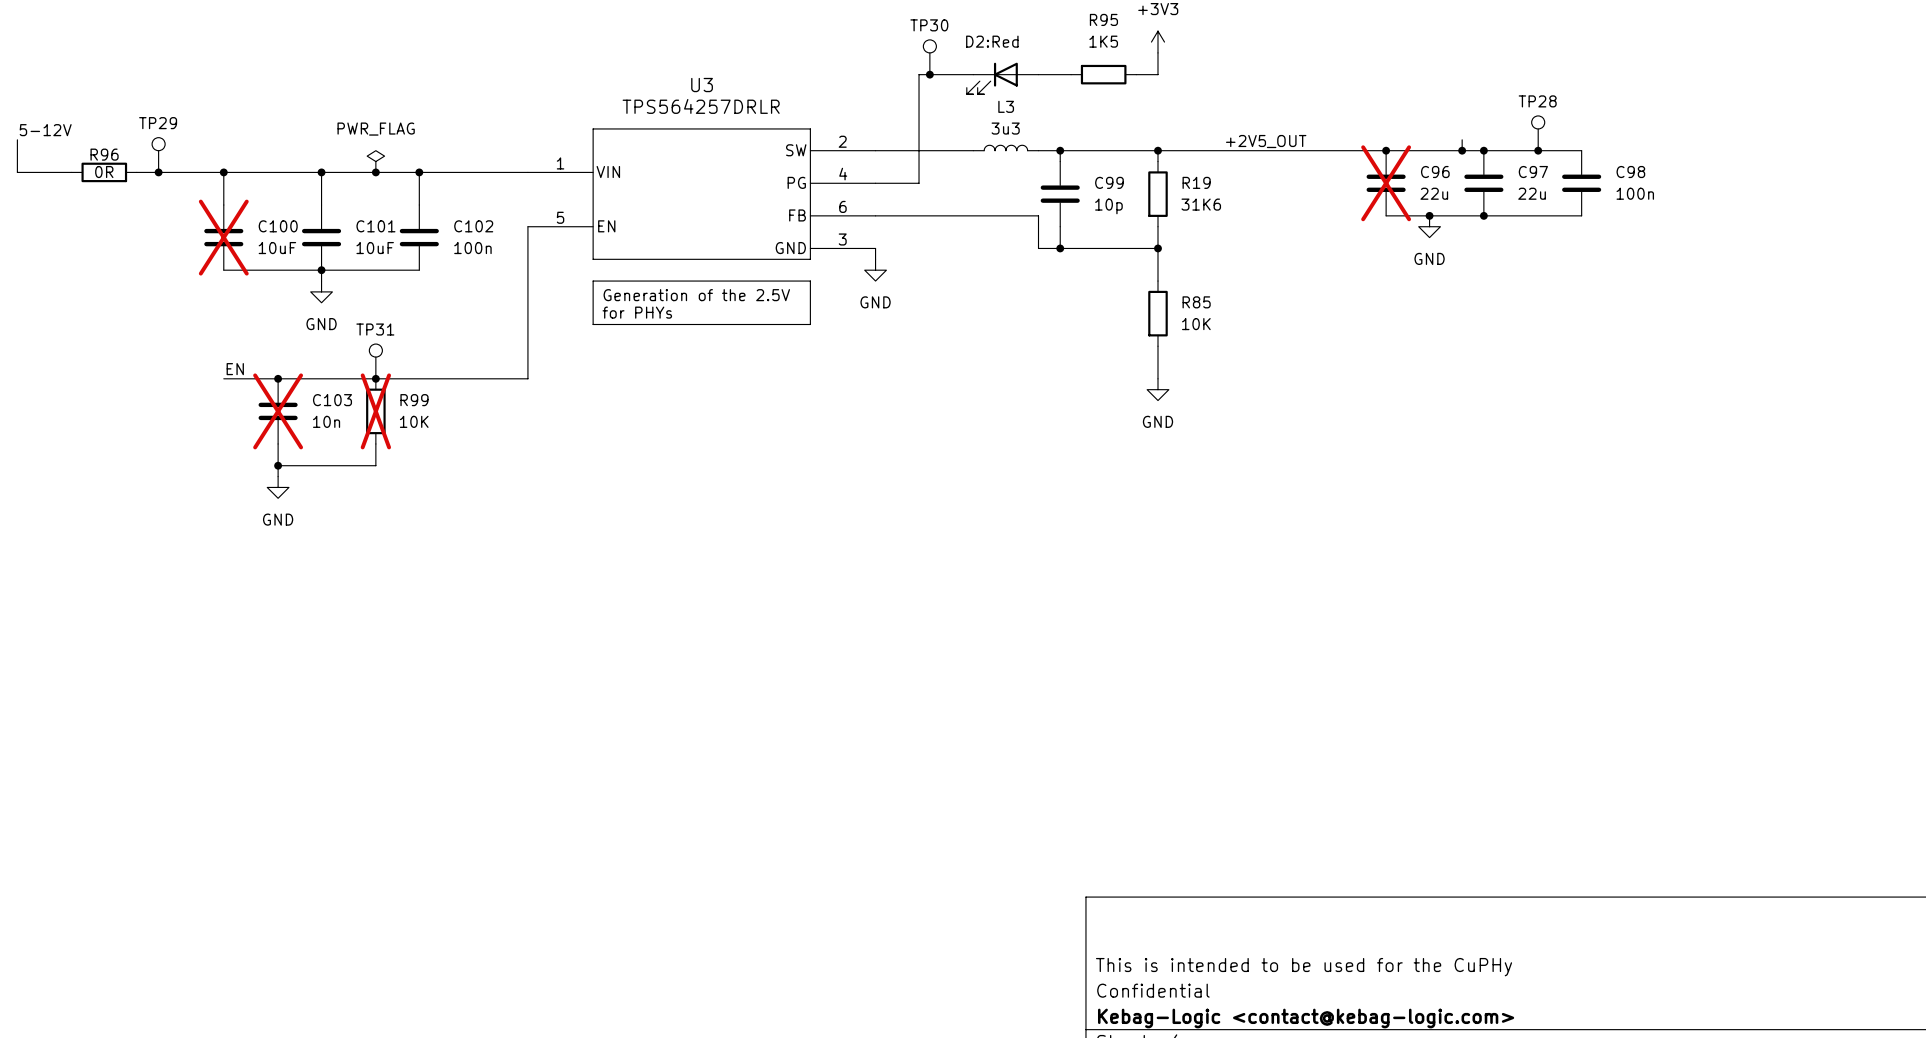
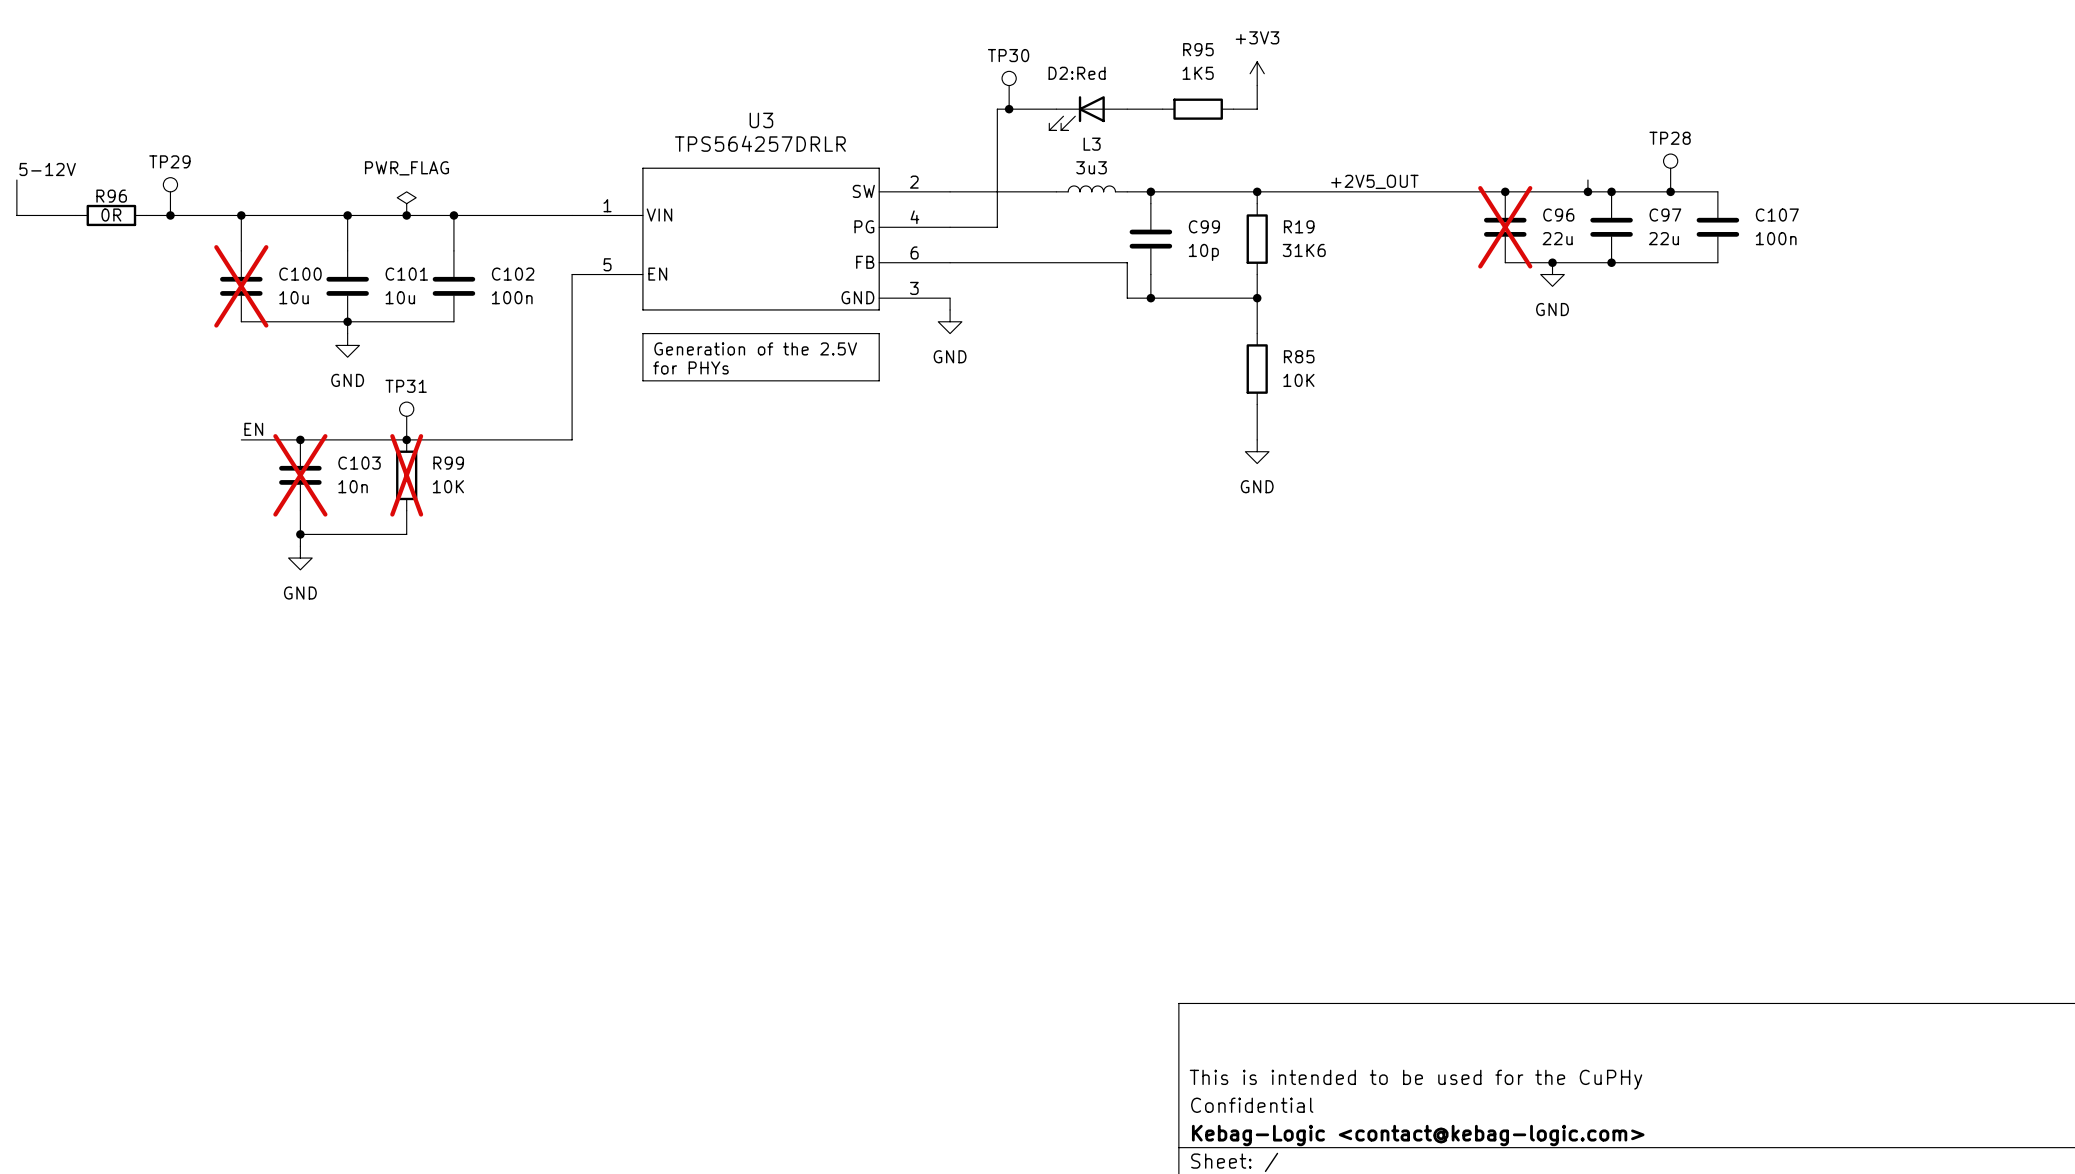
C98 name: C98 (1630, 172) -> C107 (1777, 215)
C100 value: 10uF (277, 248) -> 10u (294, 297)
C101 value: 10uF (375, 248) -> 10u (400, 297)

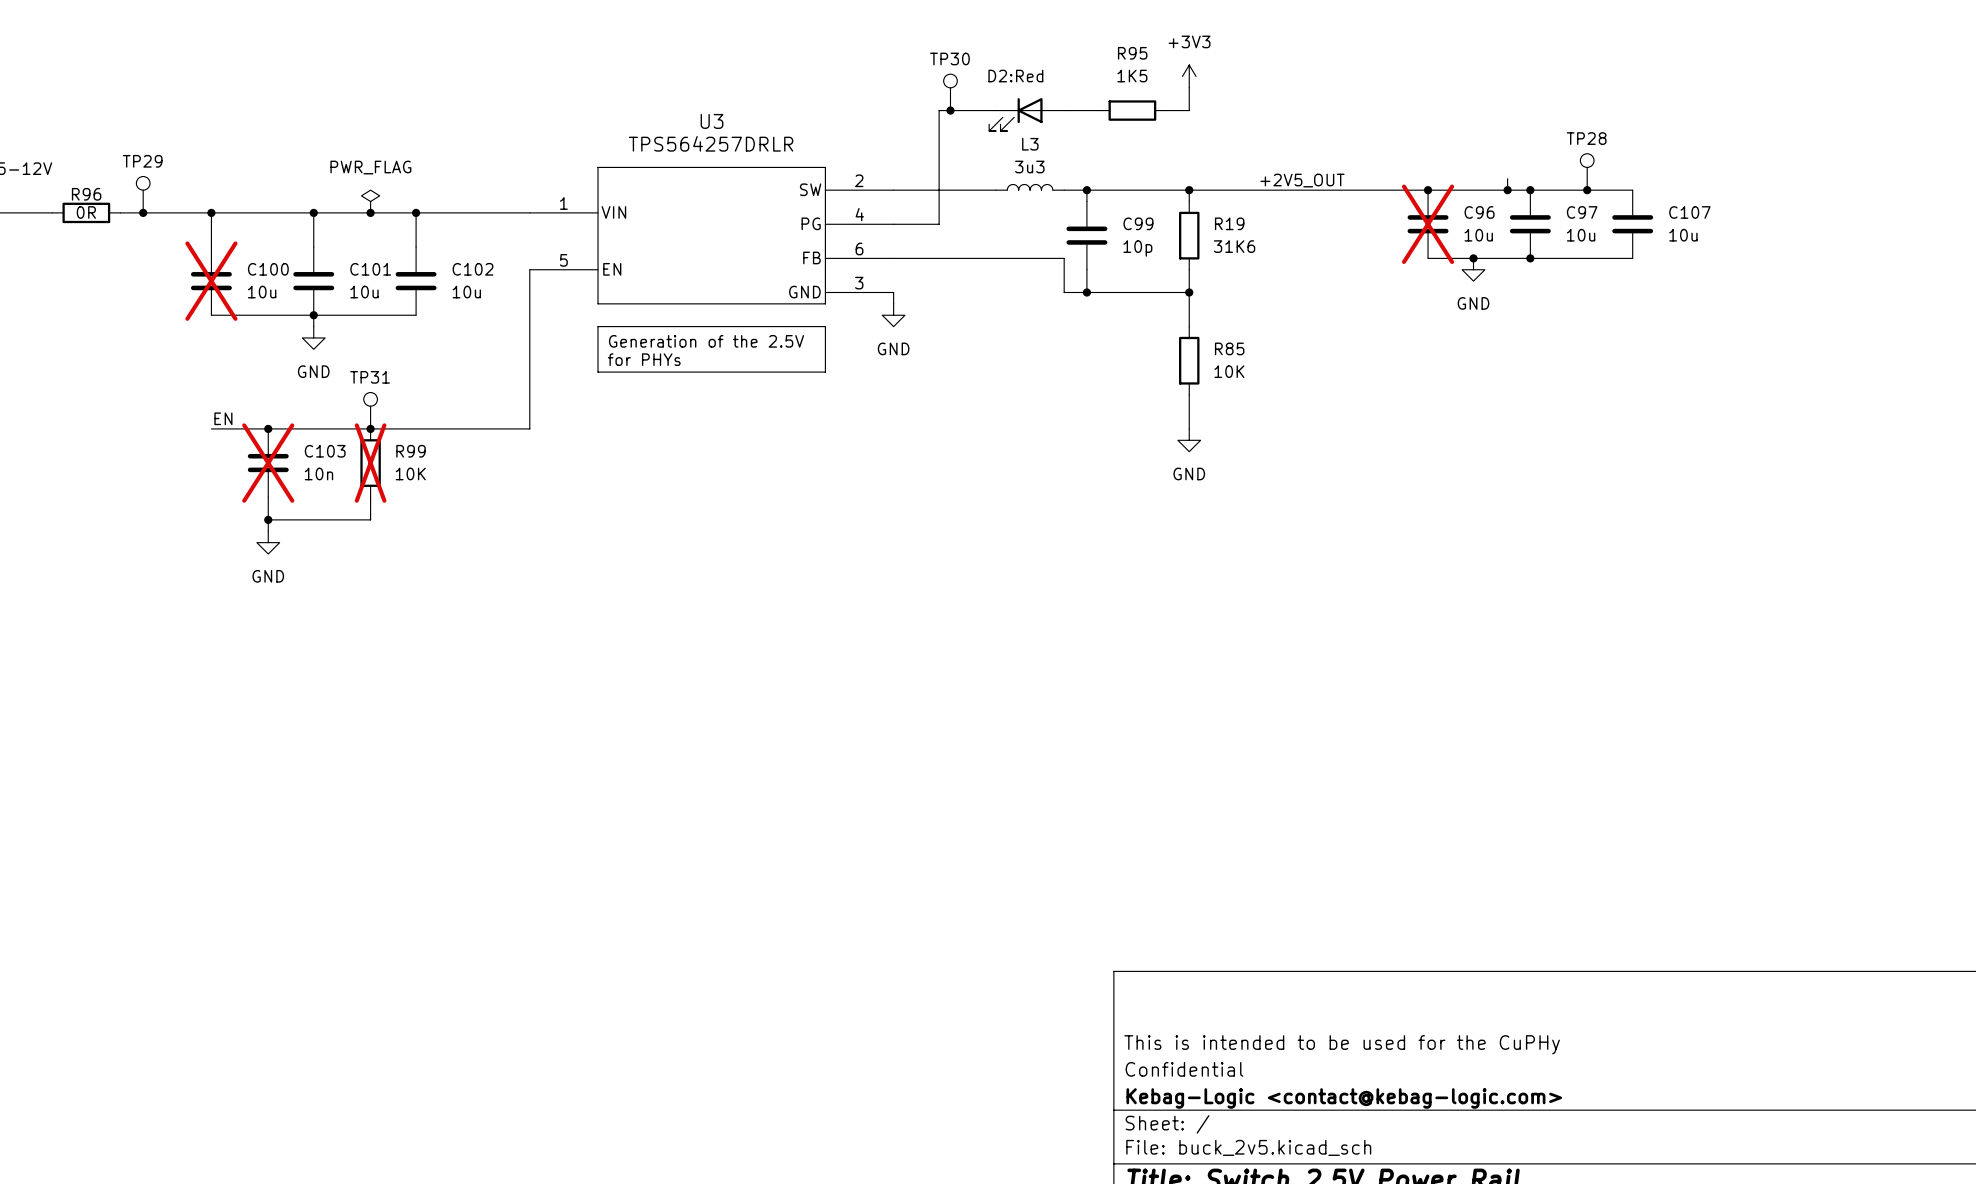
C96 value: 22u (1557, 238) -> 10u (1478, 235)
C97 value: 22u (1663, 238) -> 10u (1581, 235)
C107 value: 100n (1776, 238) -> 10u (1683, 235)
C102 value: 100n (512, 297) -> 10u (466, 292)

